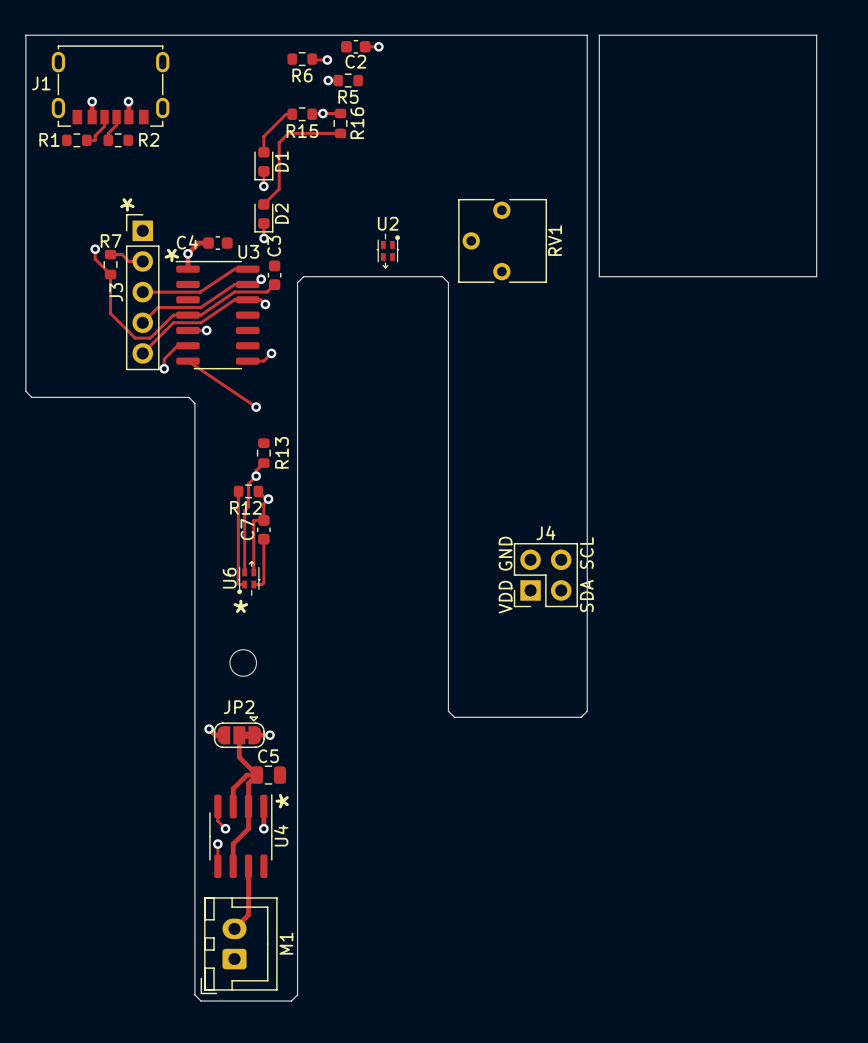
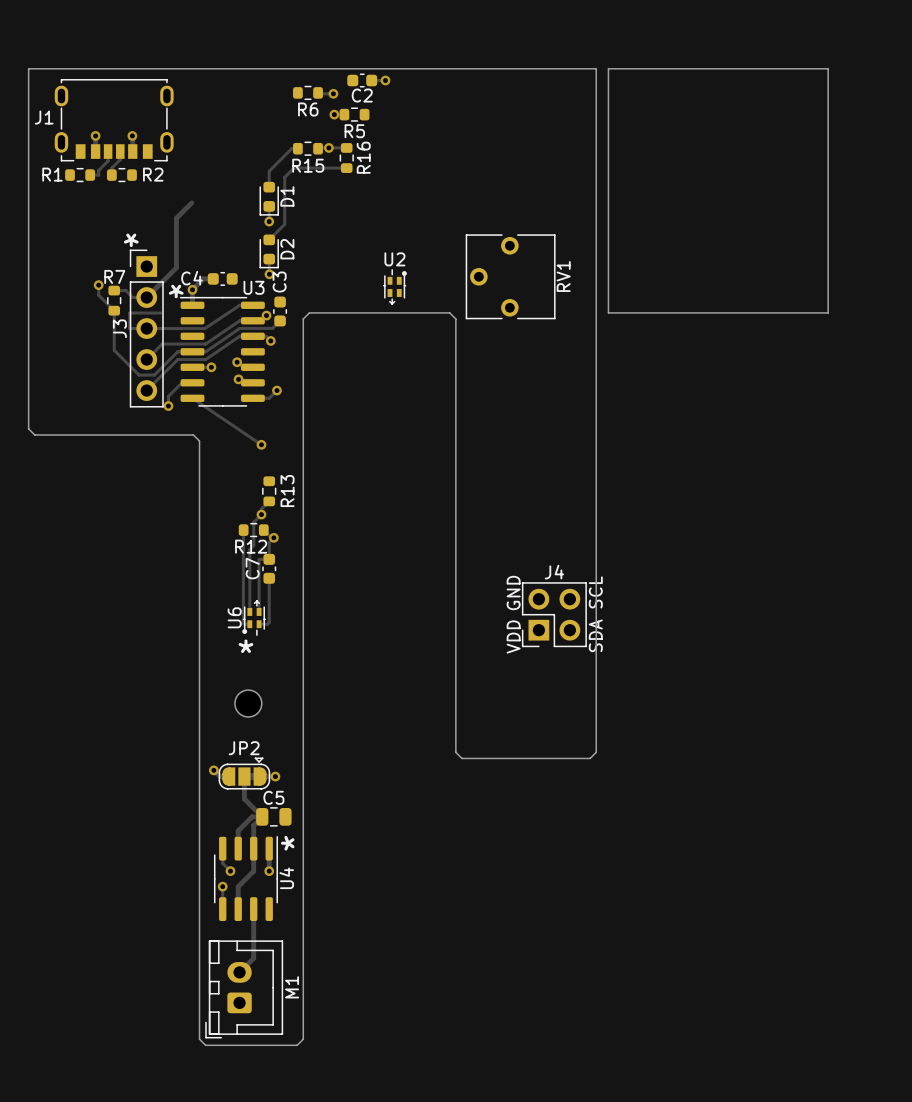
track: none -> (191, 202) (176, 218) (176, 267) (146, 297)
track: none -> (160, 313) (129, 313) (129, 328) (146, 328)
via: none -> (237, 362)
via: none -> (238, 379)

